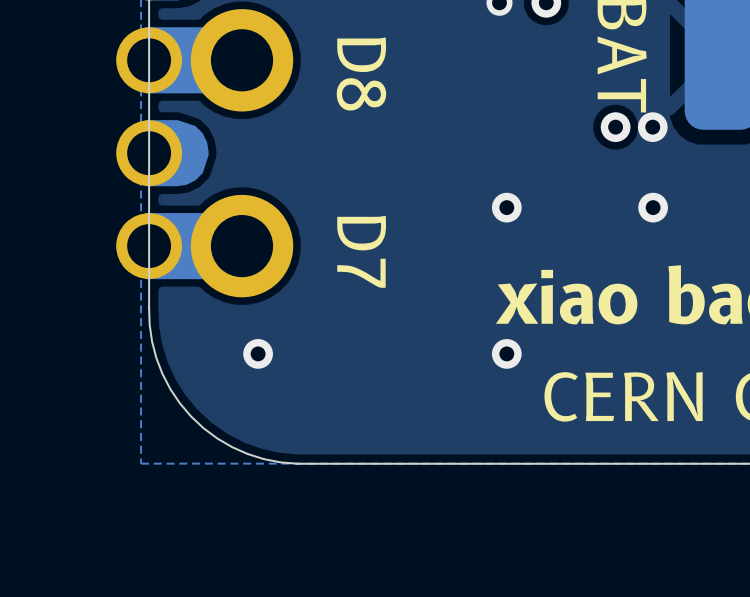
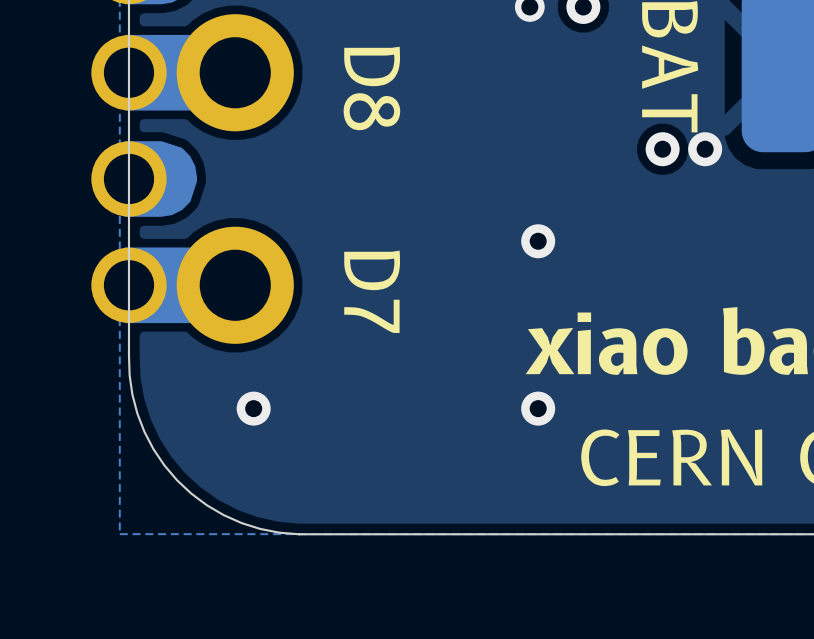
via: (653, 207) -> none

